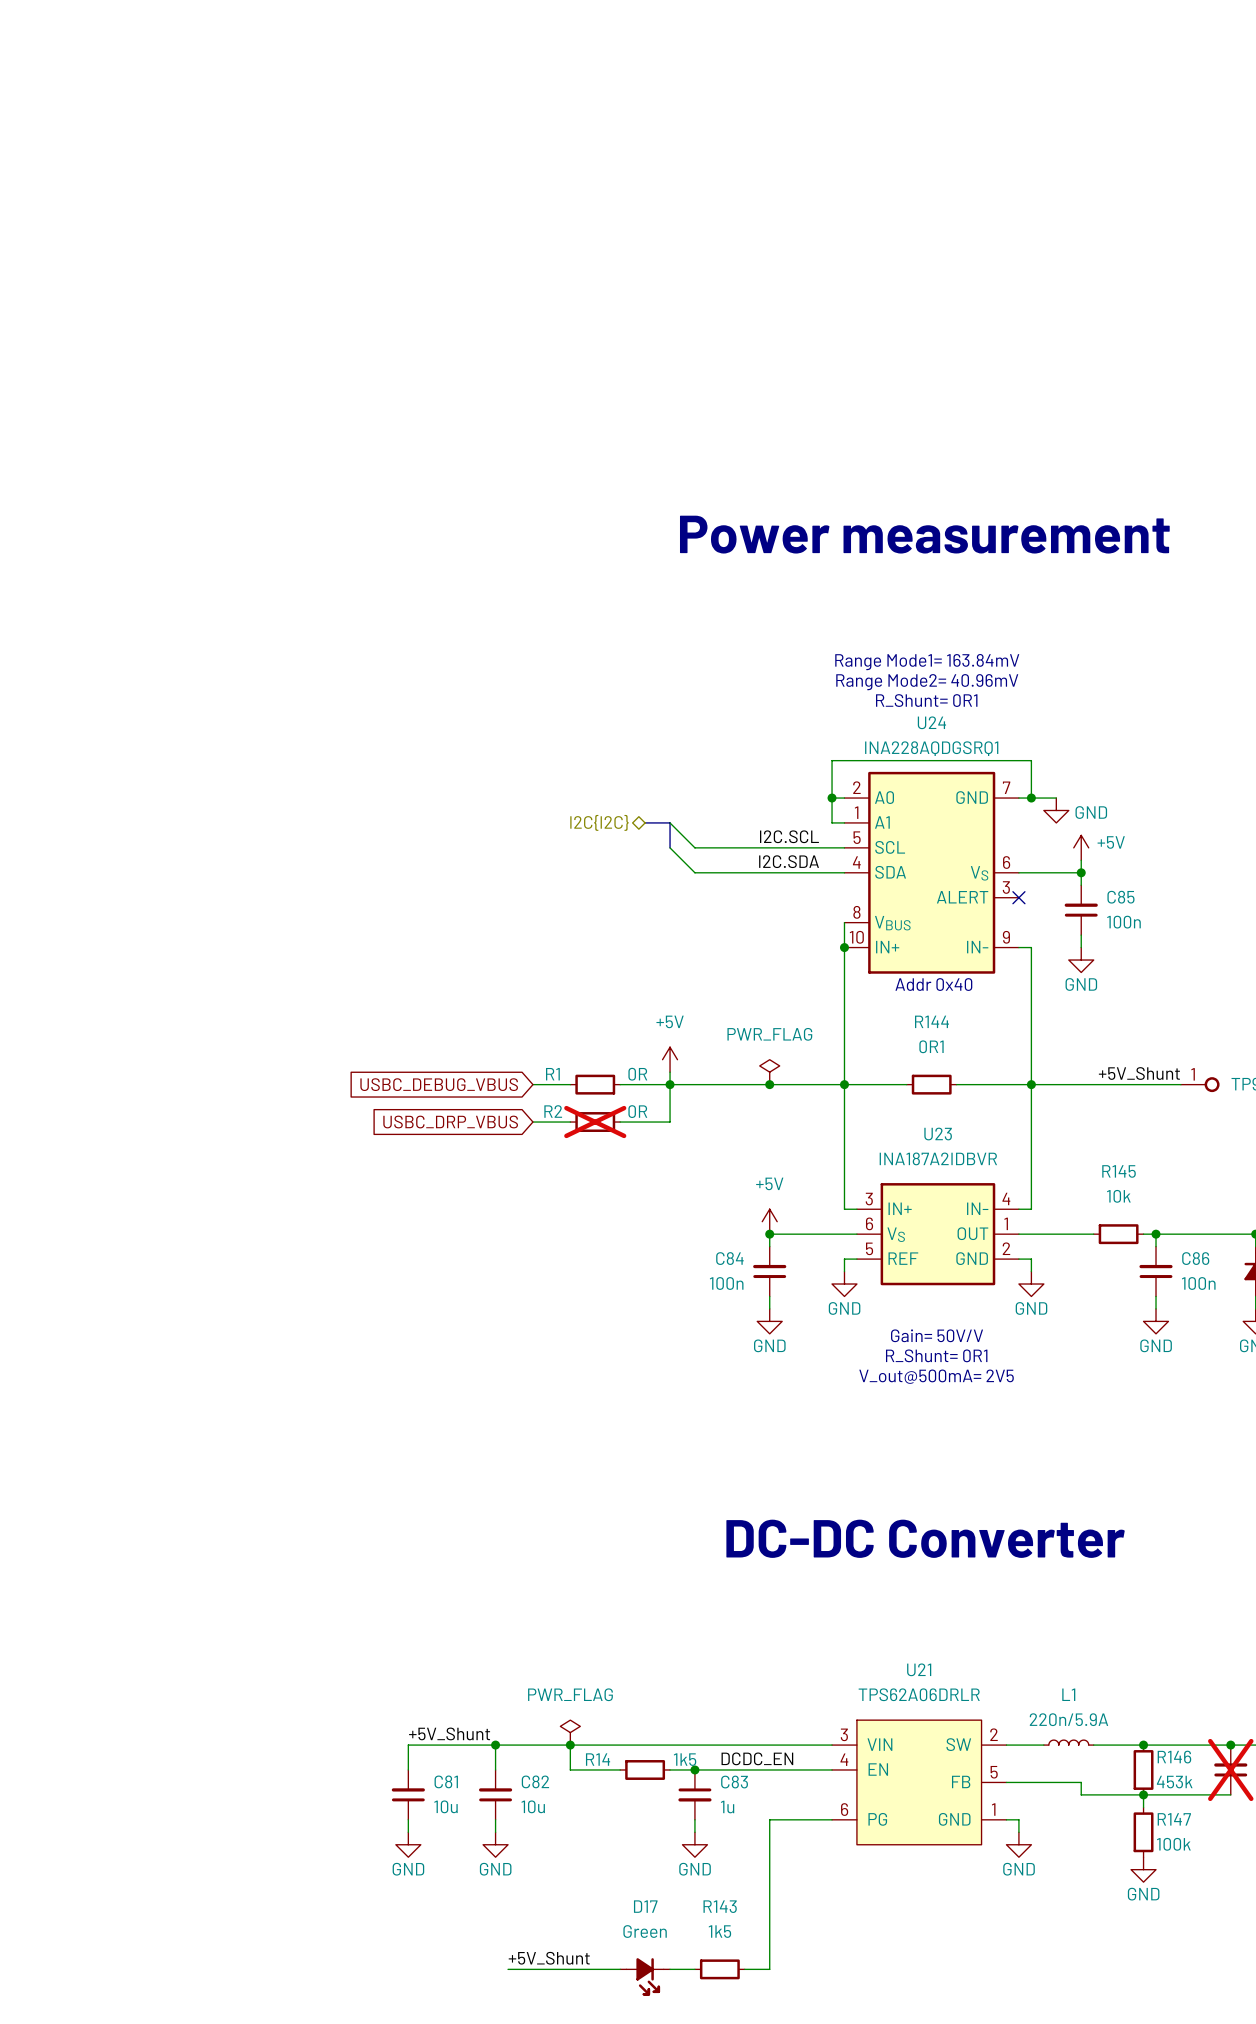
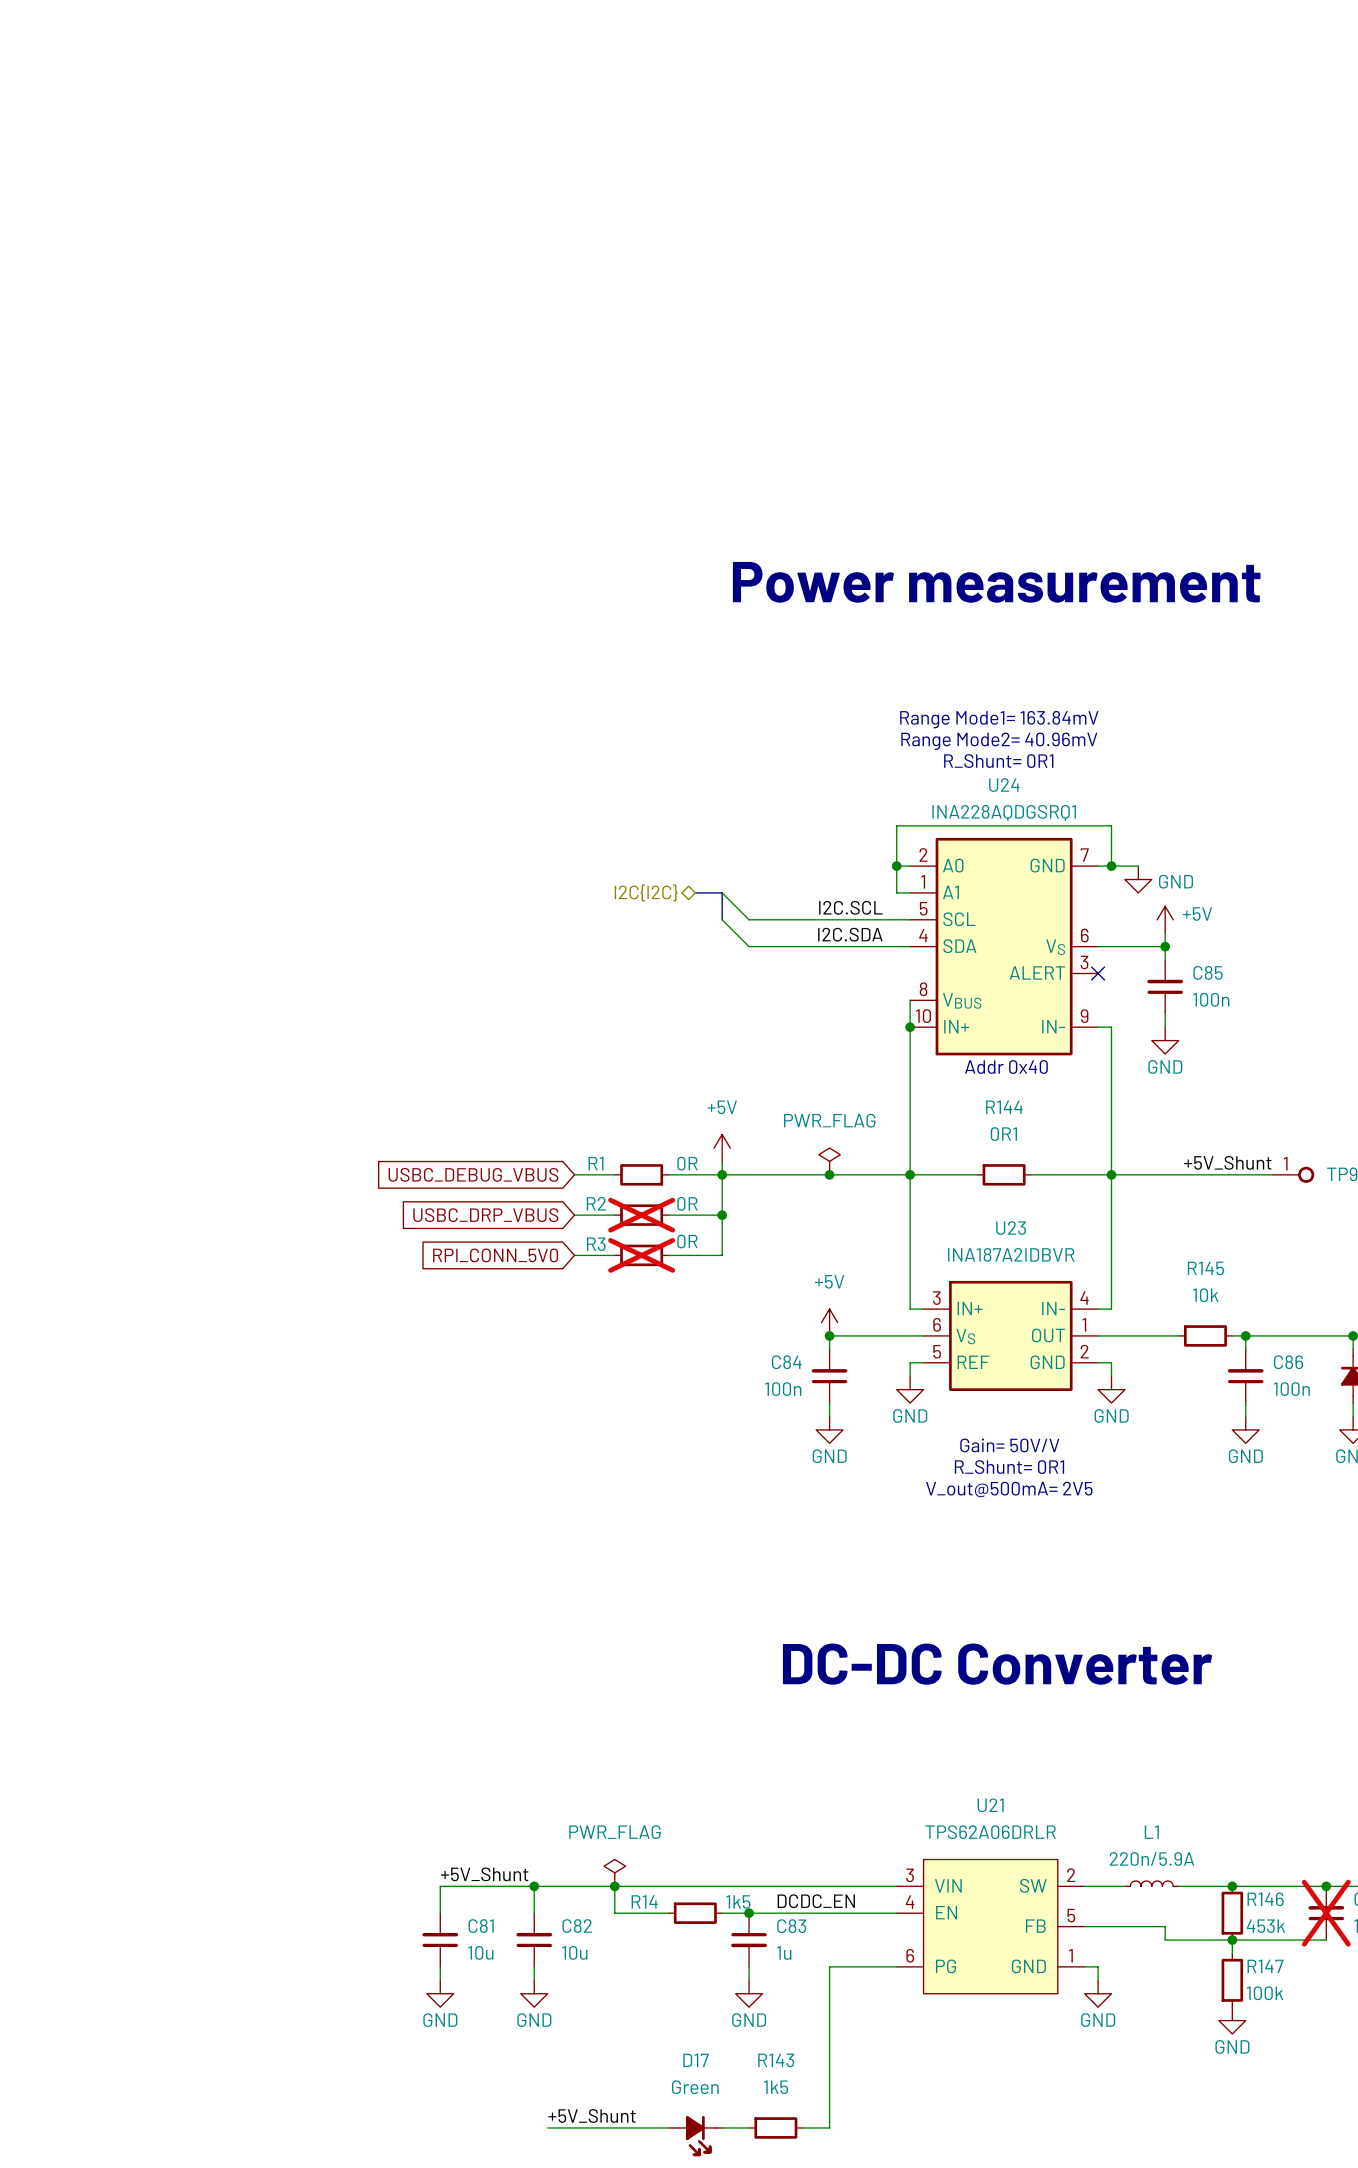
wire: none -> (722, 1215) (722, 1255) (668, 1255)
junction: none -> (722, 1215)
global label: none -> RPI_CONN_5V0 (495, 1255)
wire: none -> (574, 1255) (614, 1255)
R3: none -> (641, 1255)

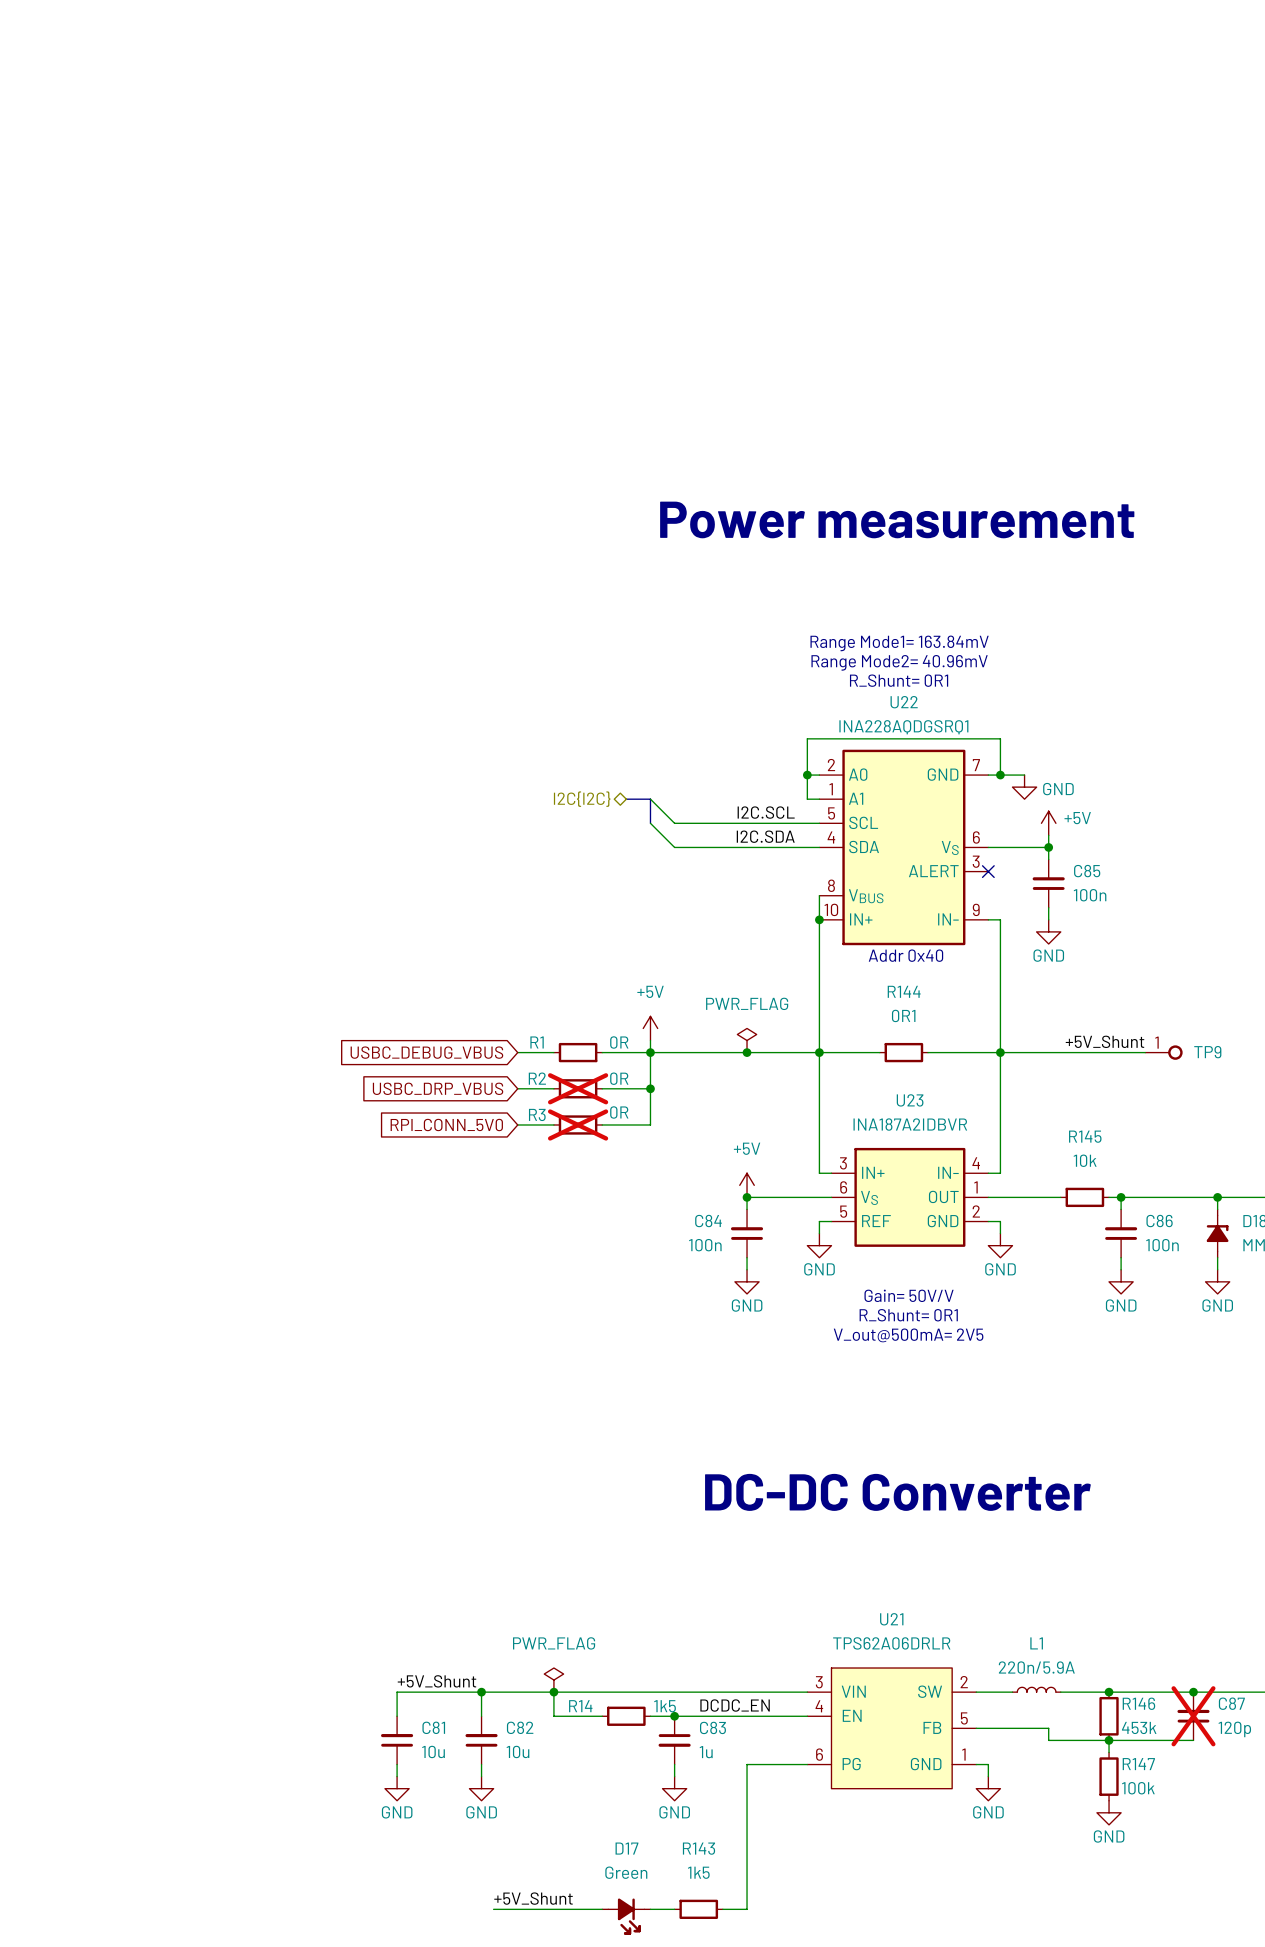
U24 name: U24 (1004, 785) -> U22 (904, 702)

